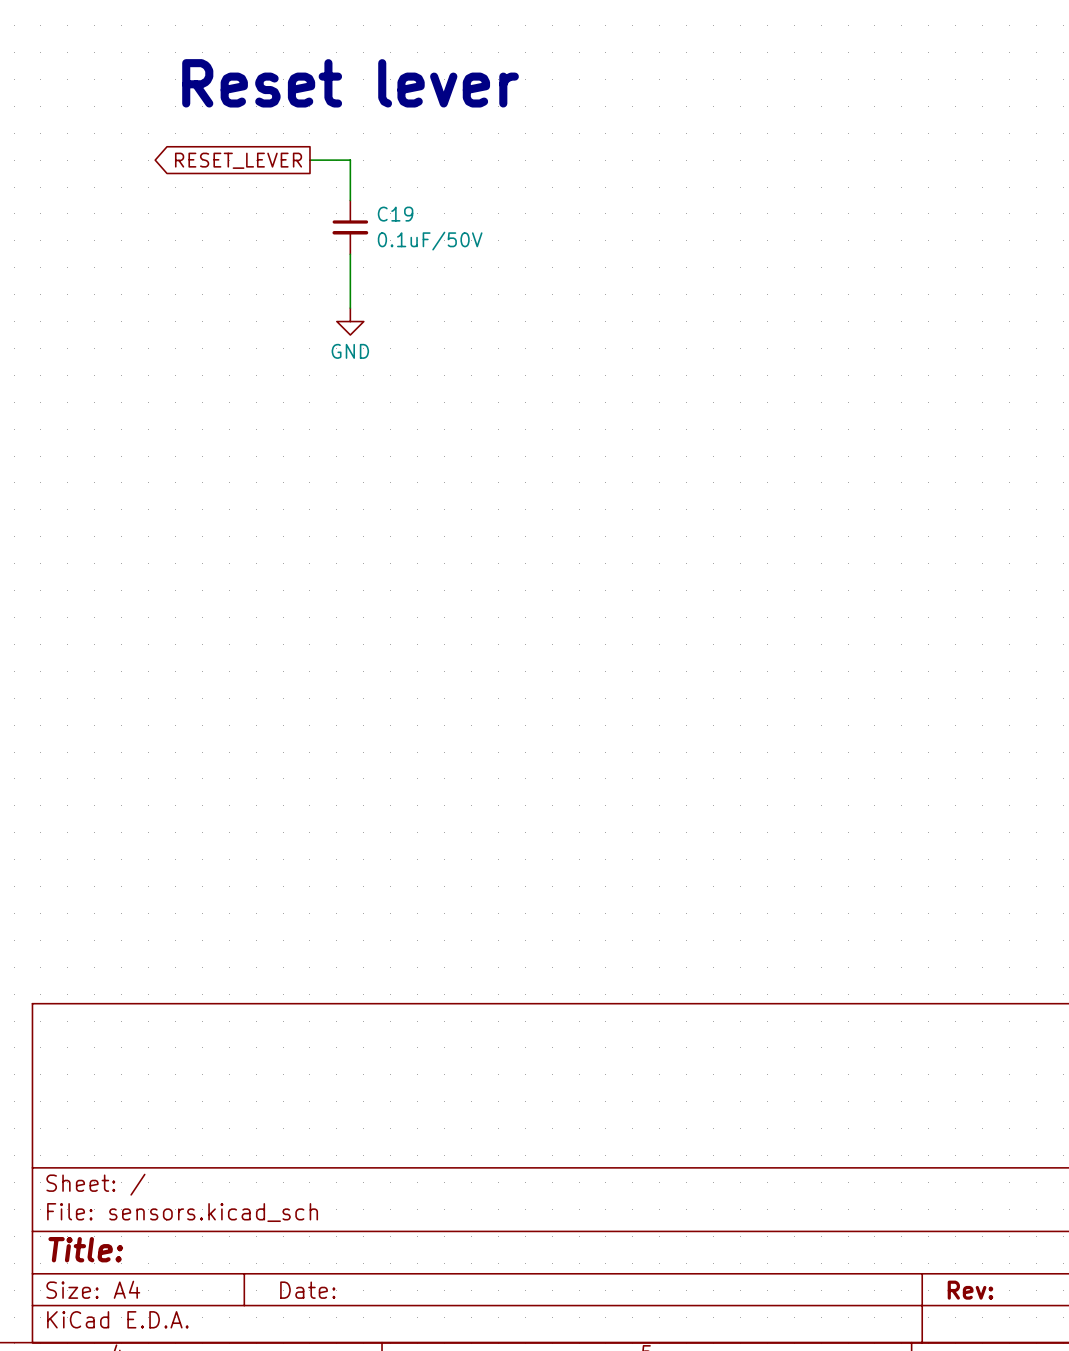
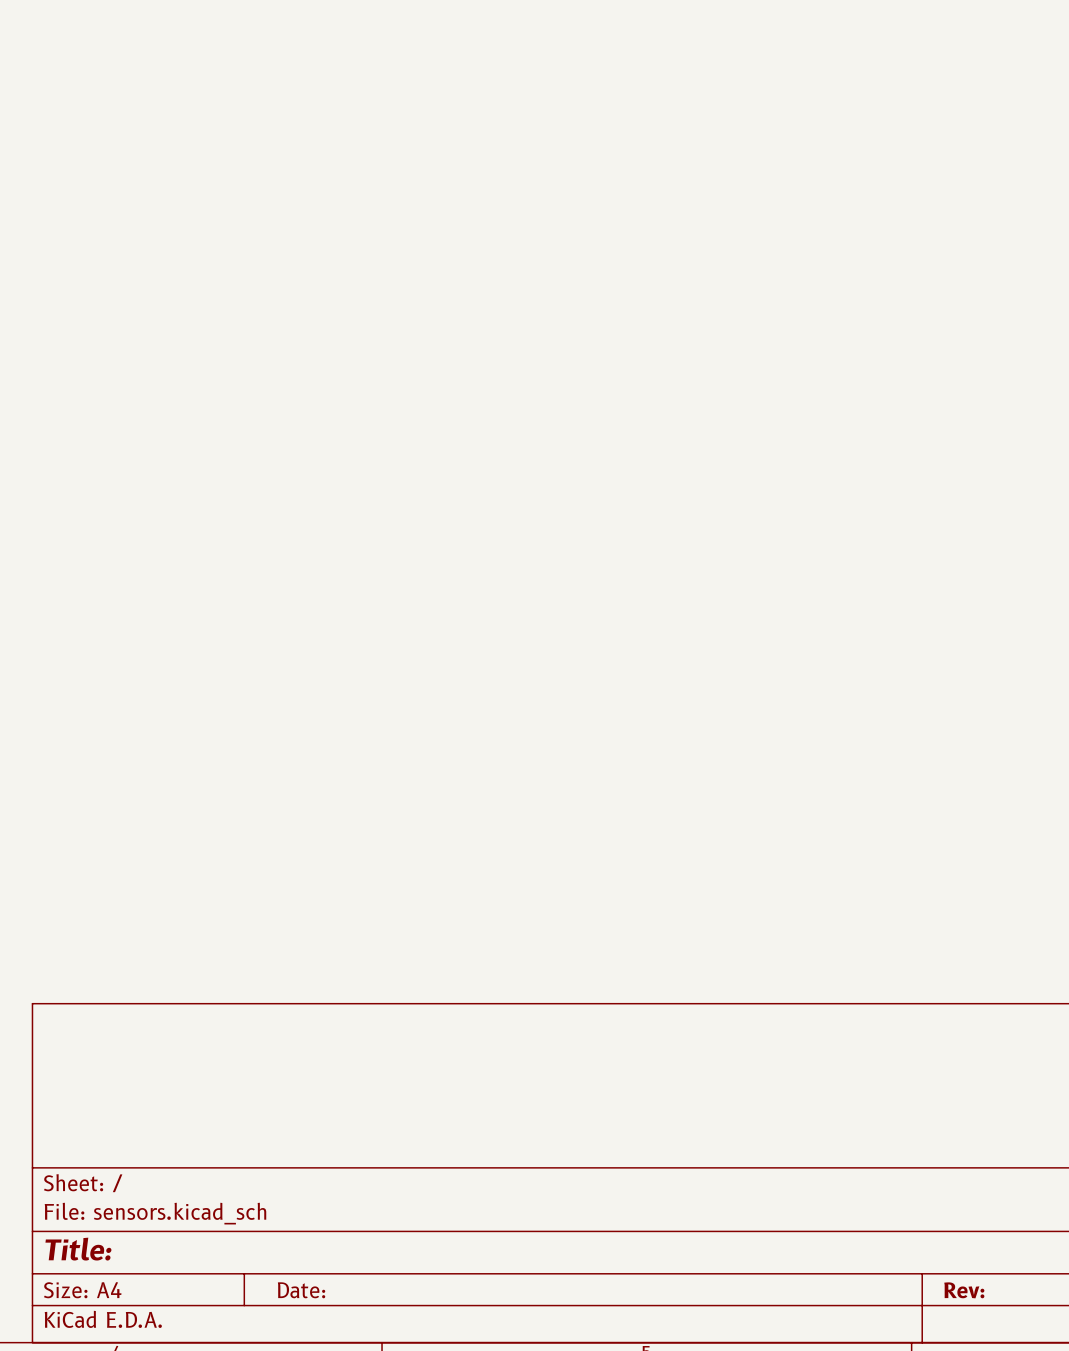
text: Reset lever (350, 83) -> none
global label: RESET_LEVER (238, 160) -> none
wire: (309, 160) (350, 160) (350, 200) -> none
C19: 0.1uF/50V (350, 227) -> none
wire: (350, 254) (350, 308) -> none
power symbol: GND (350, 321) -> none

